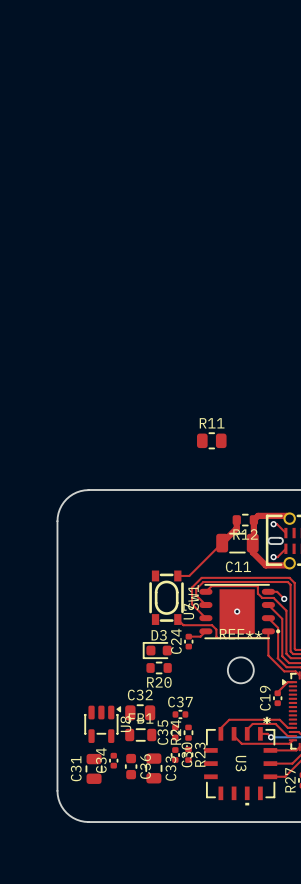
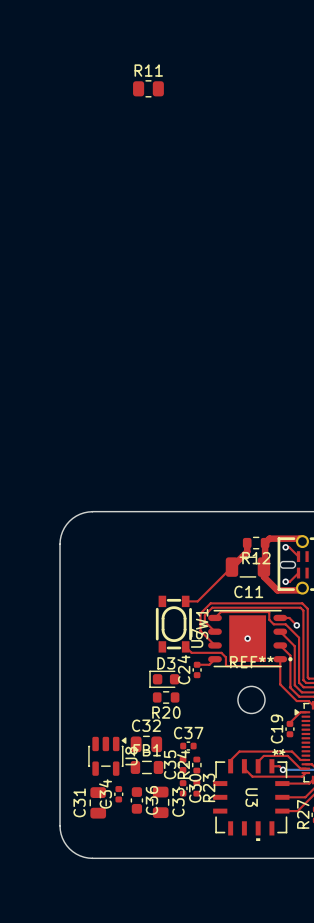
R11 position: (211, 440) -> (148, 88)

